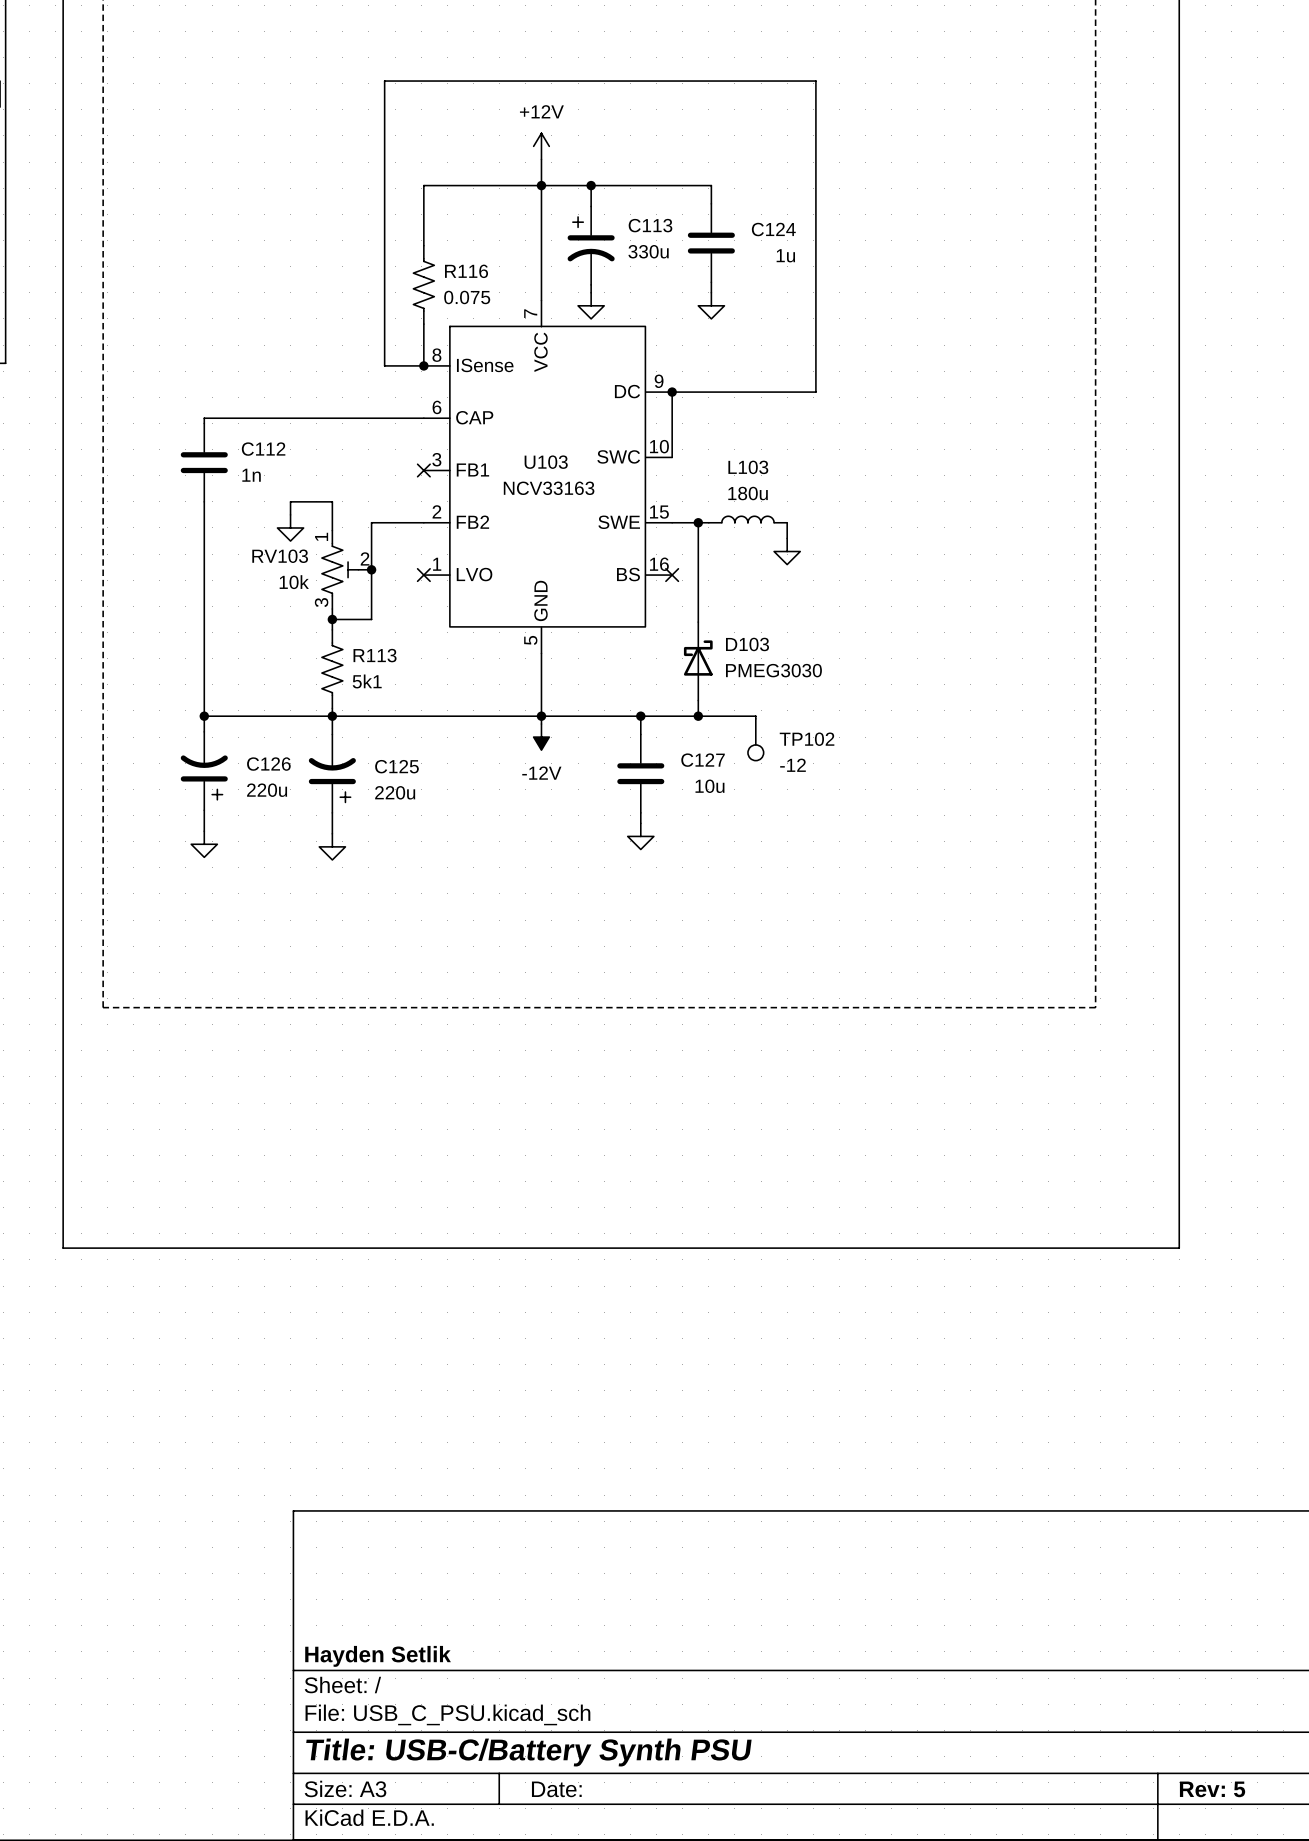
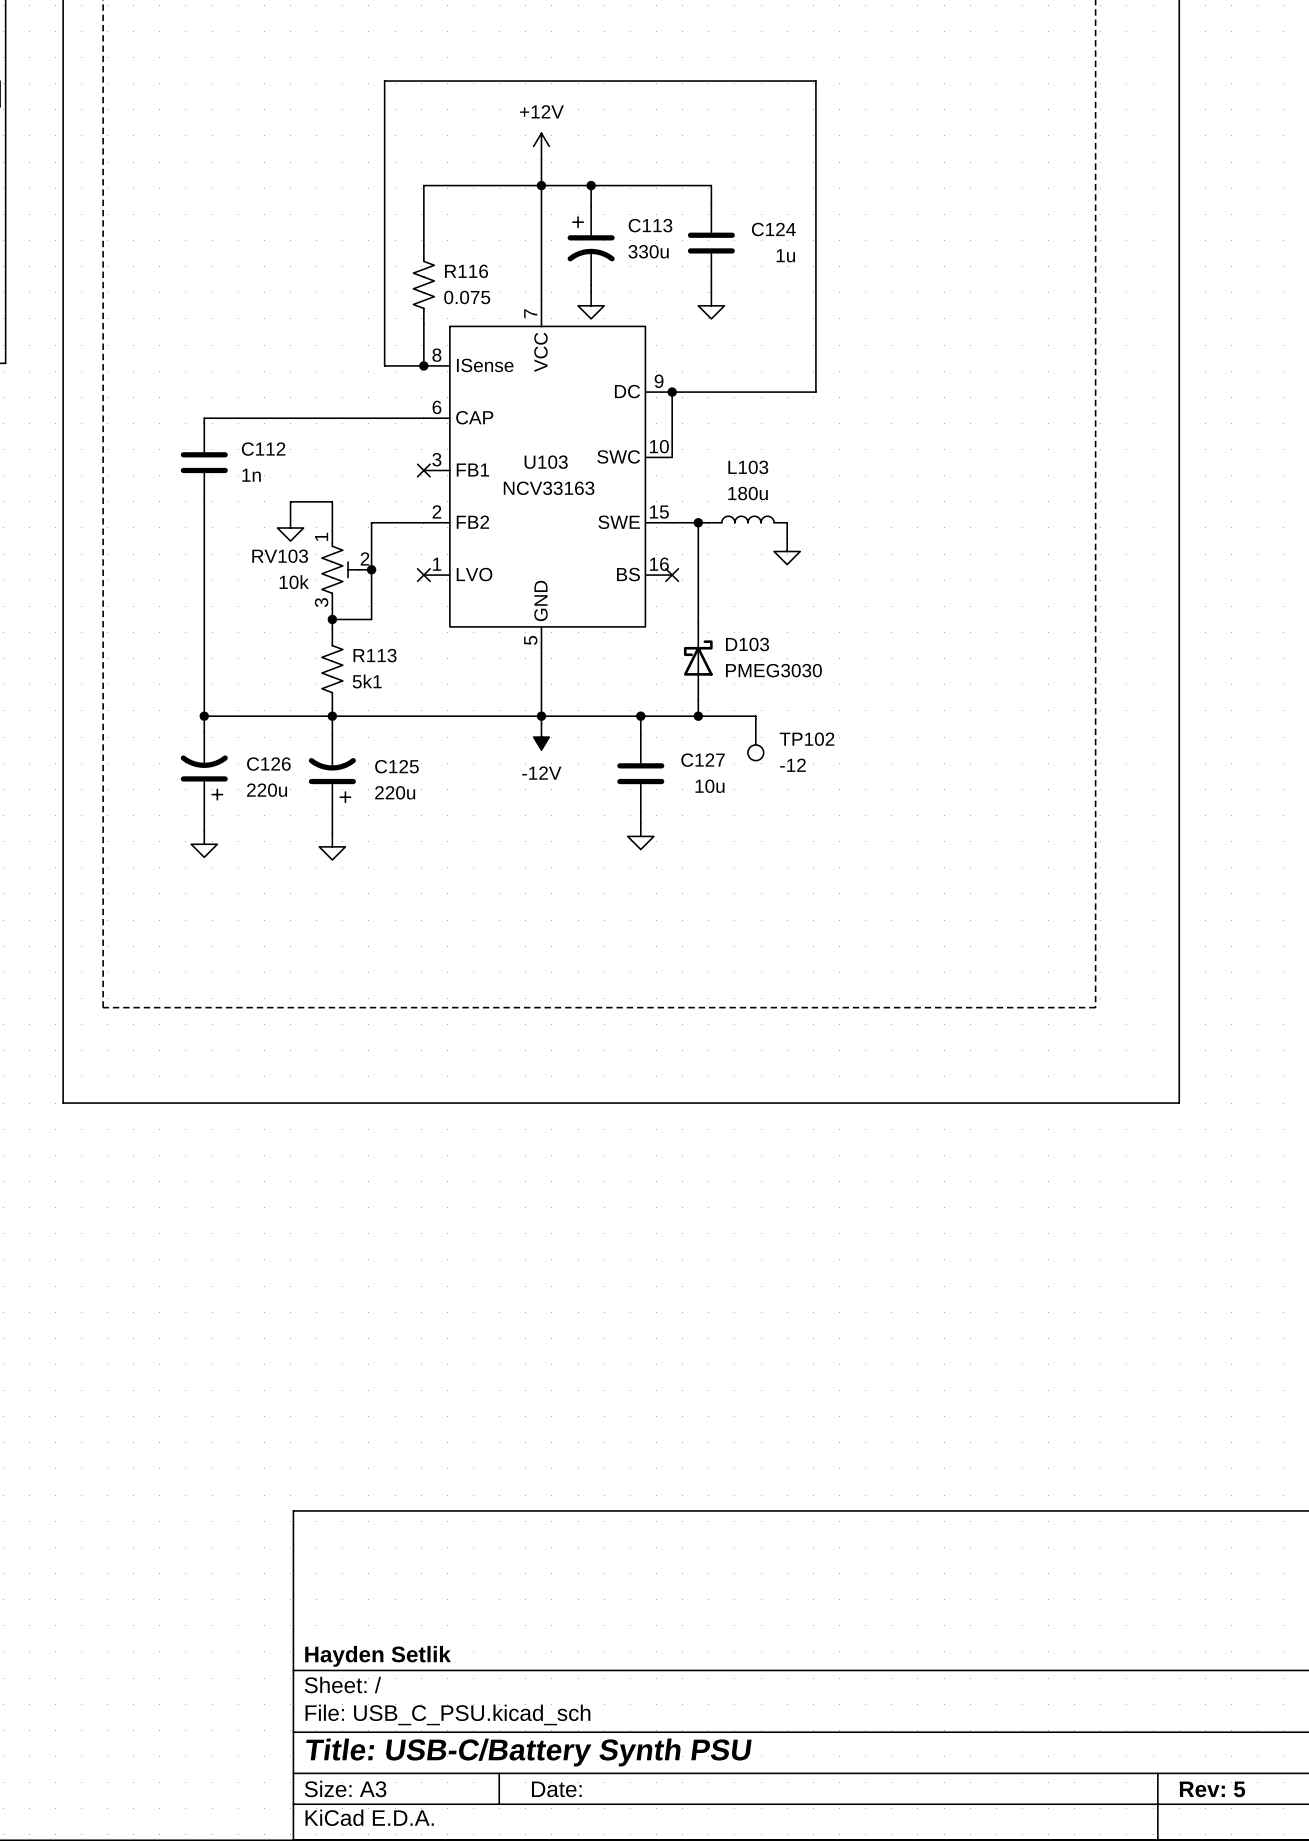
line: (63, 1103) (63, 1248) (1179, 1248) (1179, 1103) -> (63, 1103) (1179, 1103)

